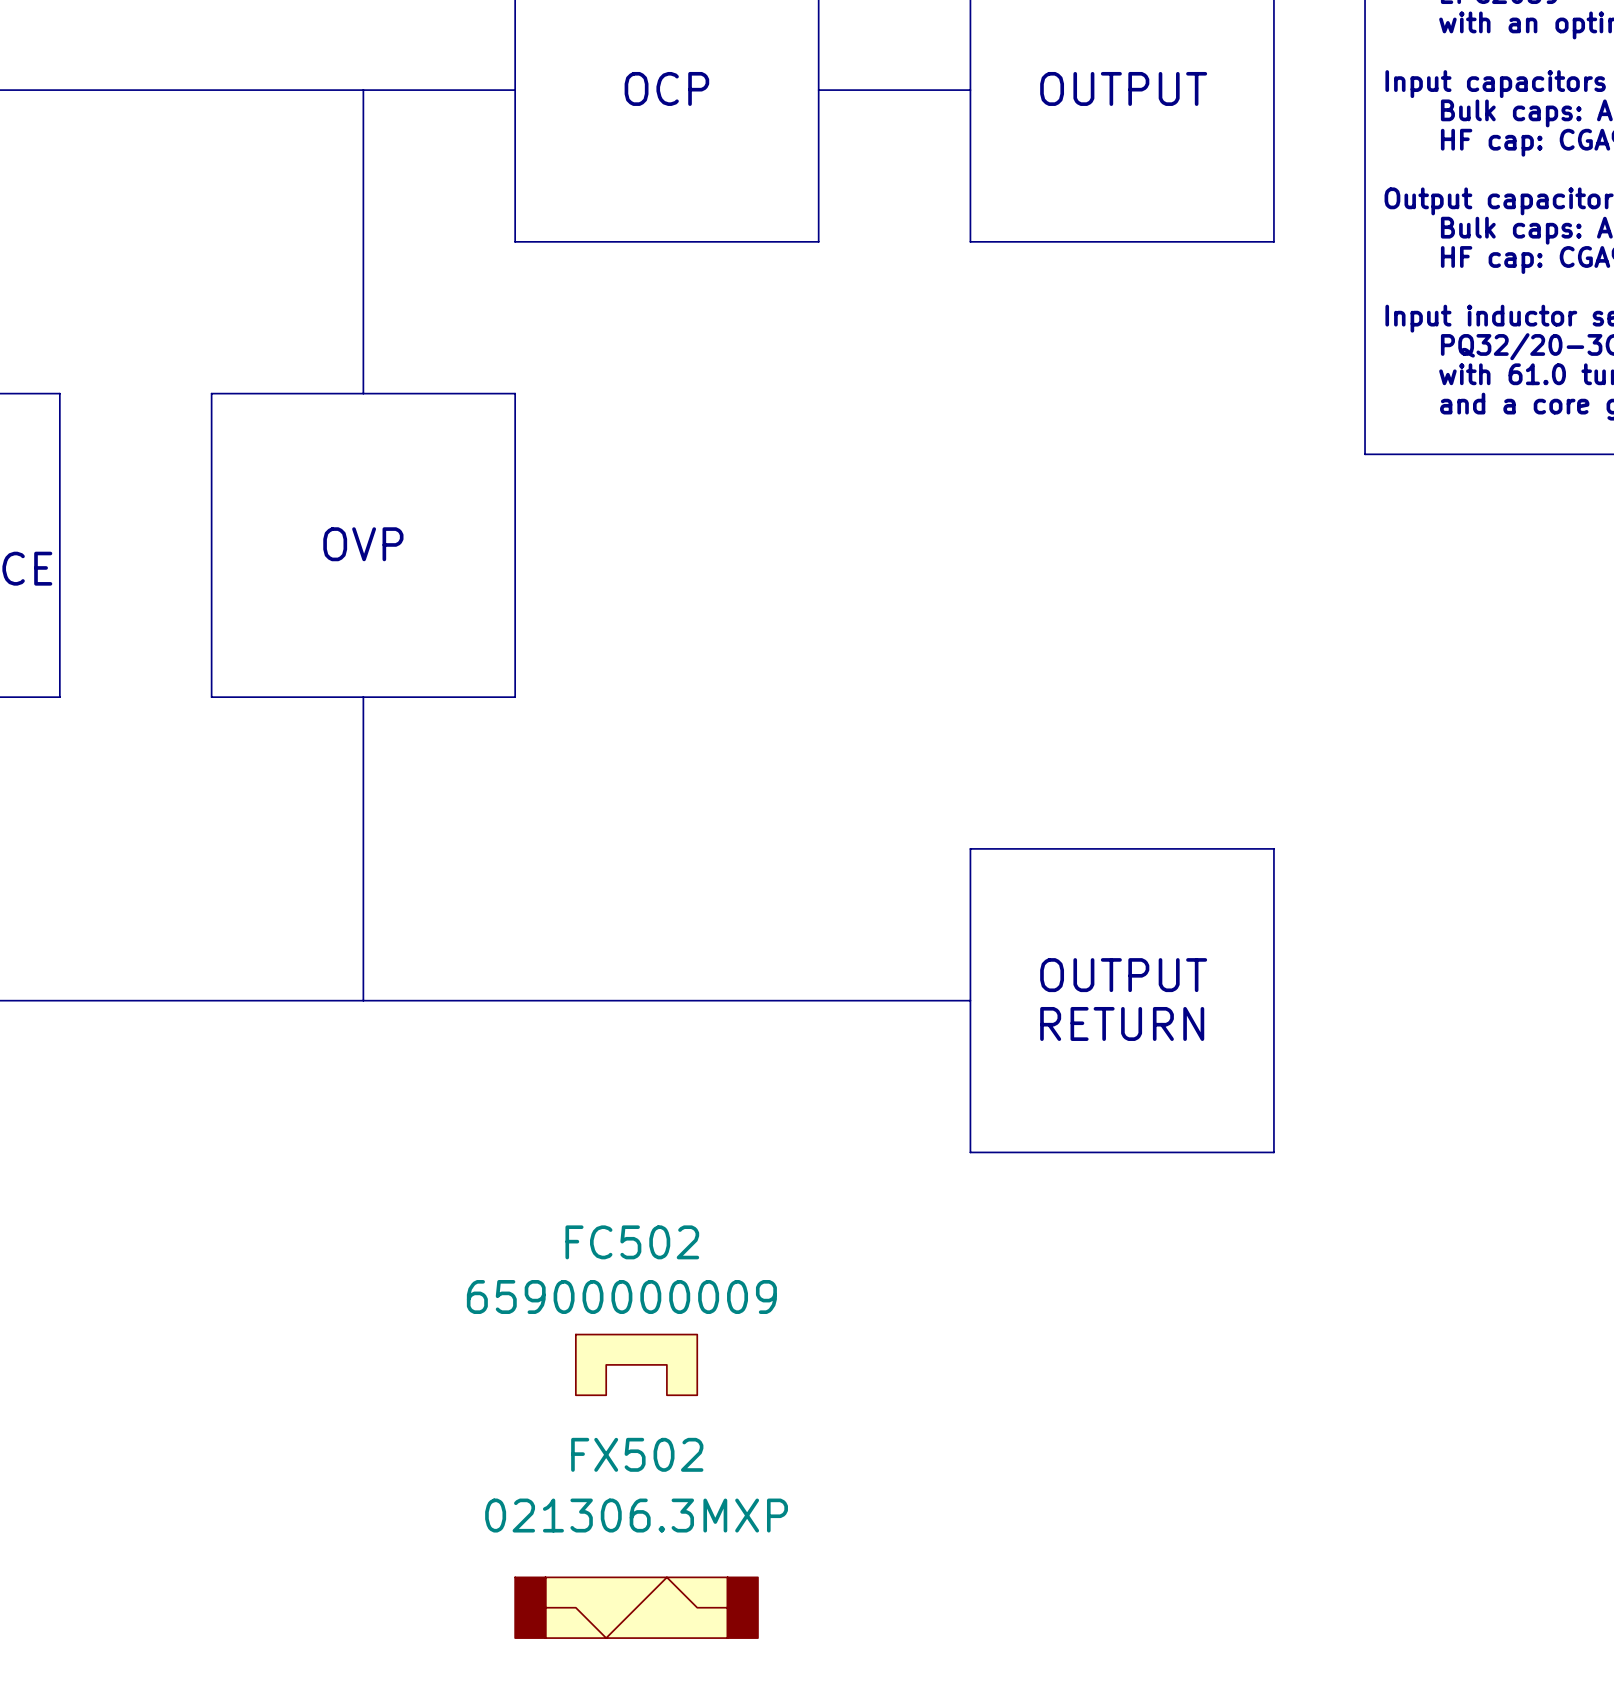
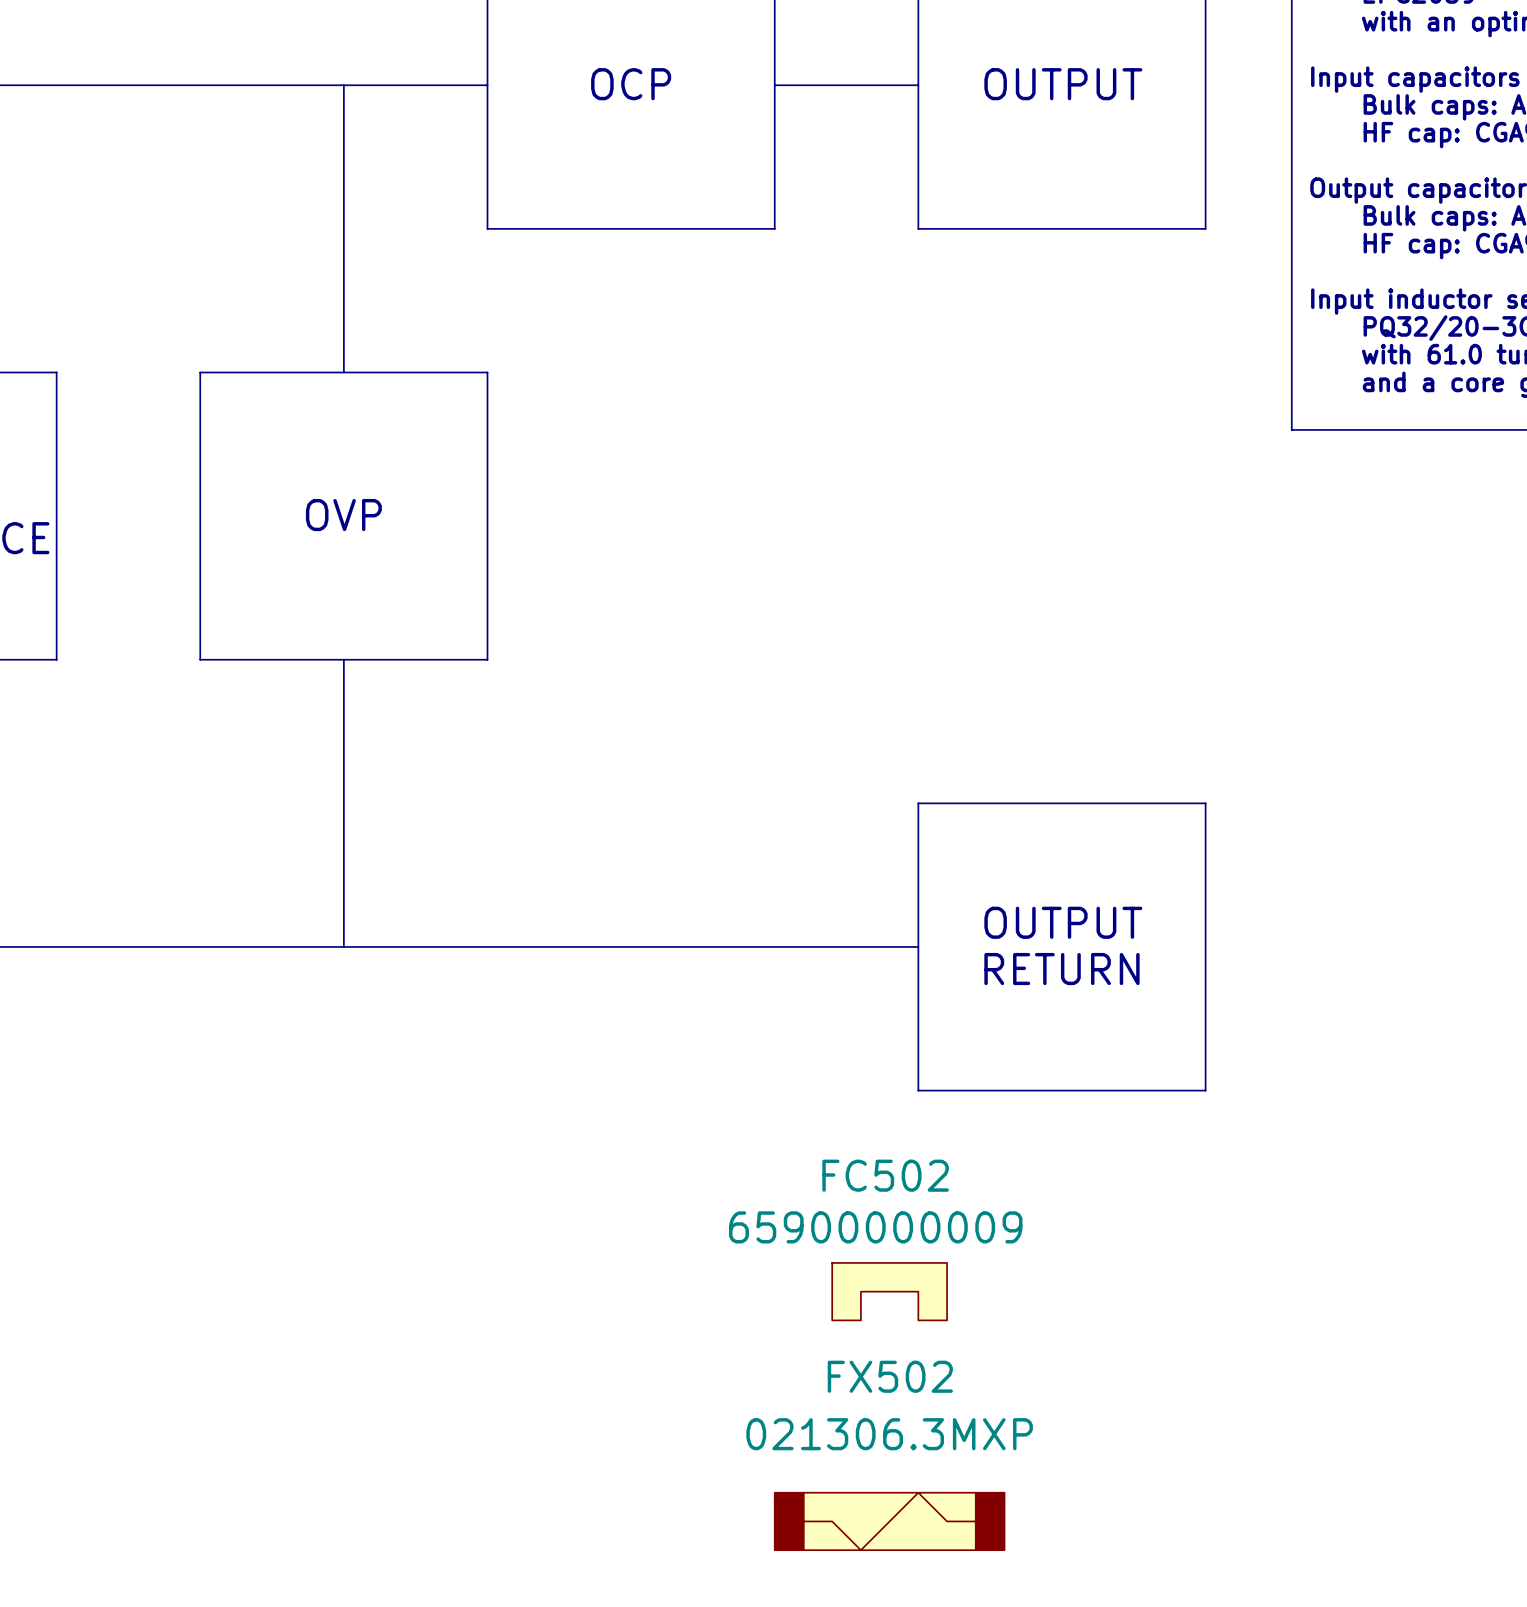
FC502 position: (636, 1364) -> (889, 1291)
FX502 position: (636, 1607) -> (889, 1521)

